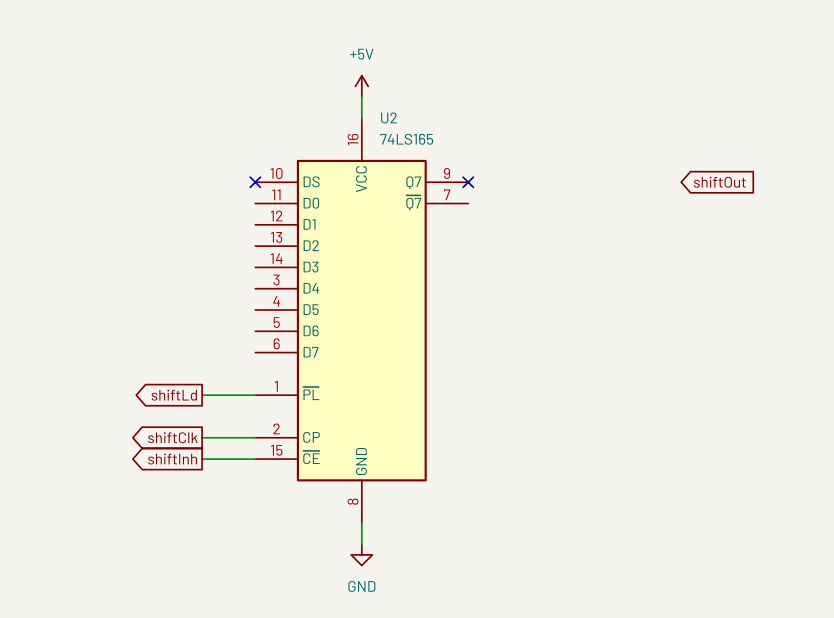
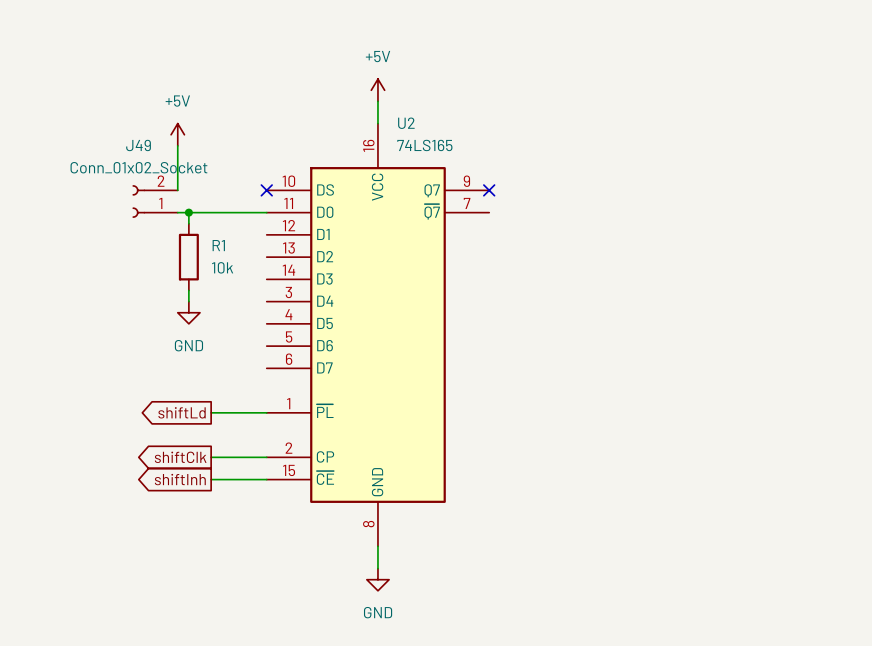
power symbol: none -> +5V (177, 134)
wire: none -> (177, 145) (177, 190)
global label: shiftOut (719, 182) -> none
J49: none -> Conn_01x02_Socket (155, 201)
wire: none -> (177, 212) (266, 212)
wire: none -> (188, 212) (188, 223)
junction: none -> (188, 212)
R1: none -> 10k (188, 257)
wire: none -> (188, 290) (188, 301)
power symbol: none -> GND (188, 312)

